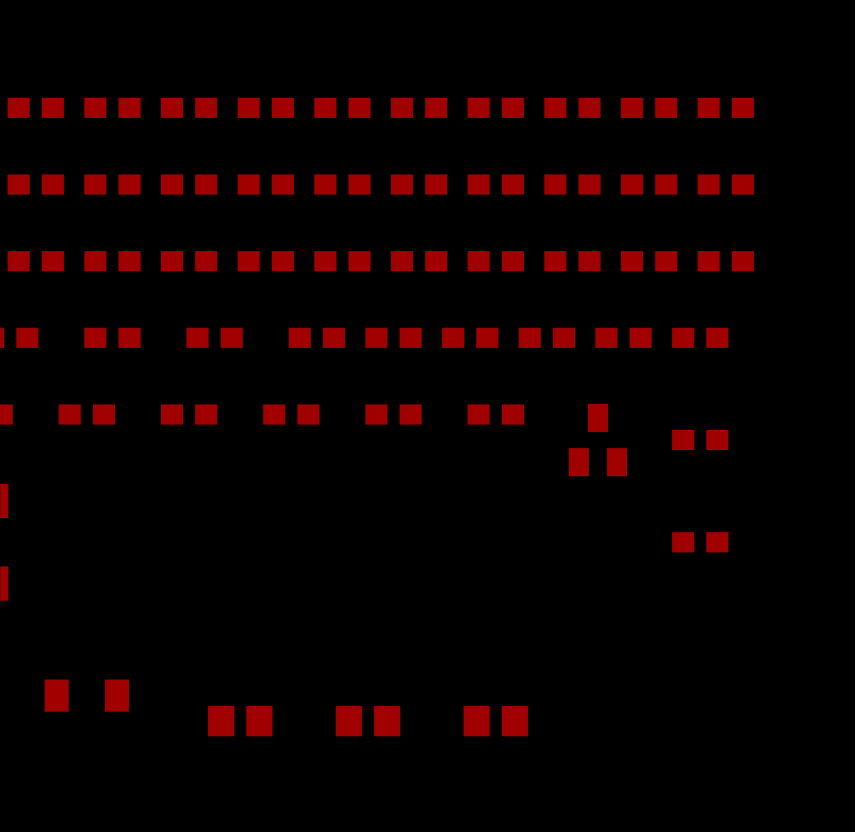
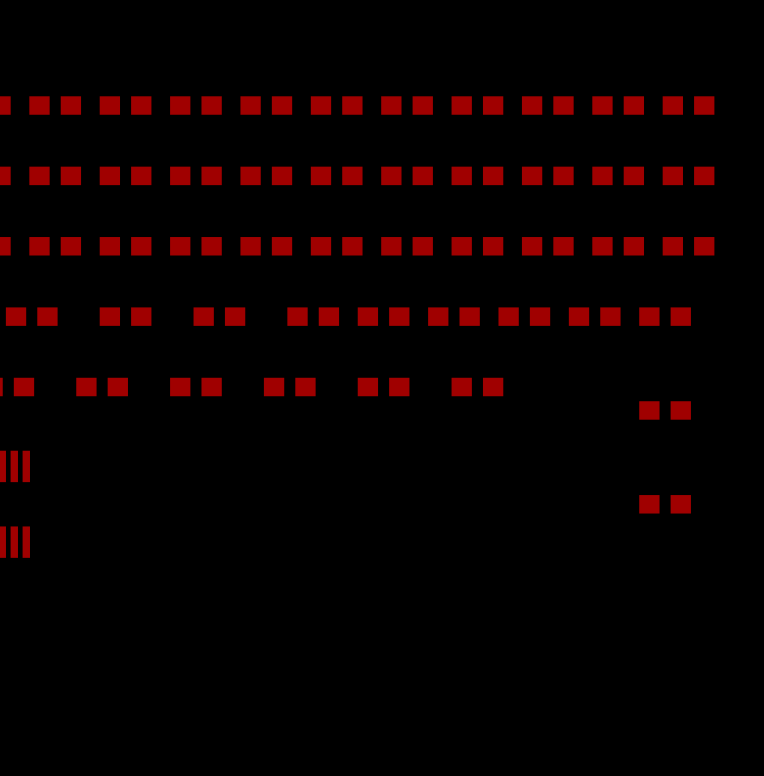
part: (597, 440) -> none
part: (86, 695) -> none
part: (240, 721) -> none
part: (367, 721) -> none
part: (495, 721) -> none

